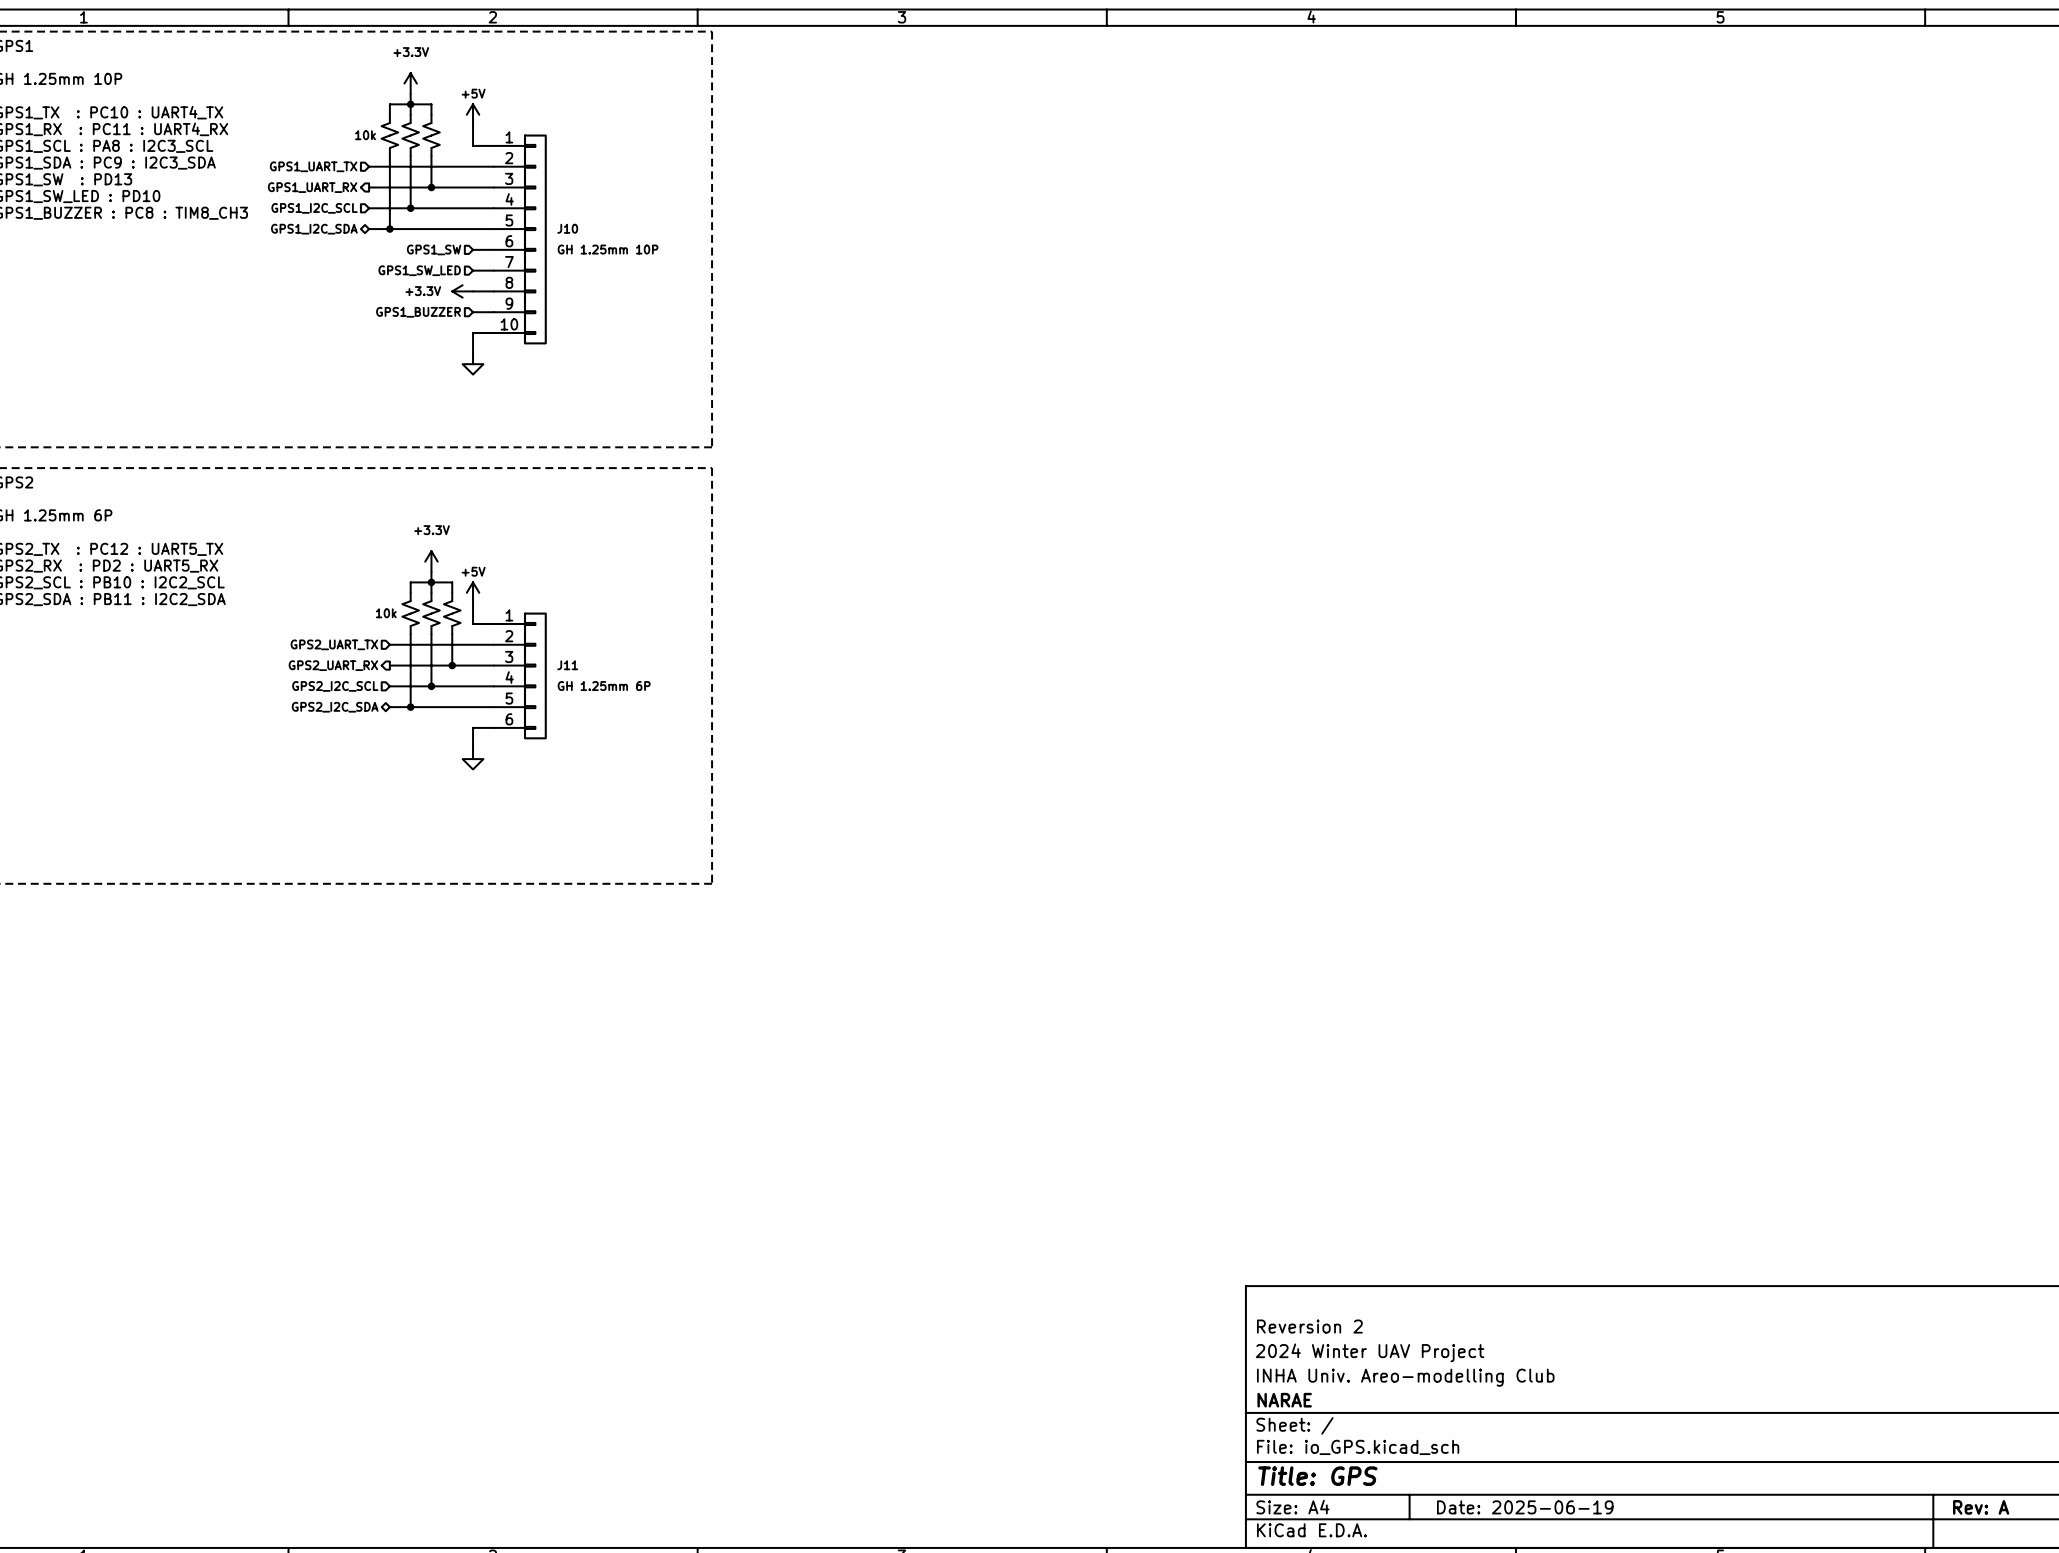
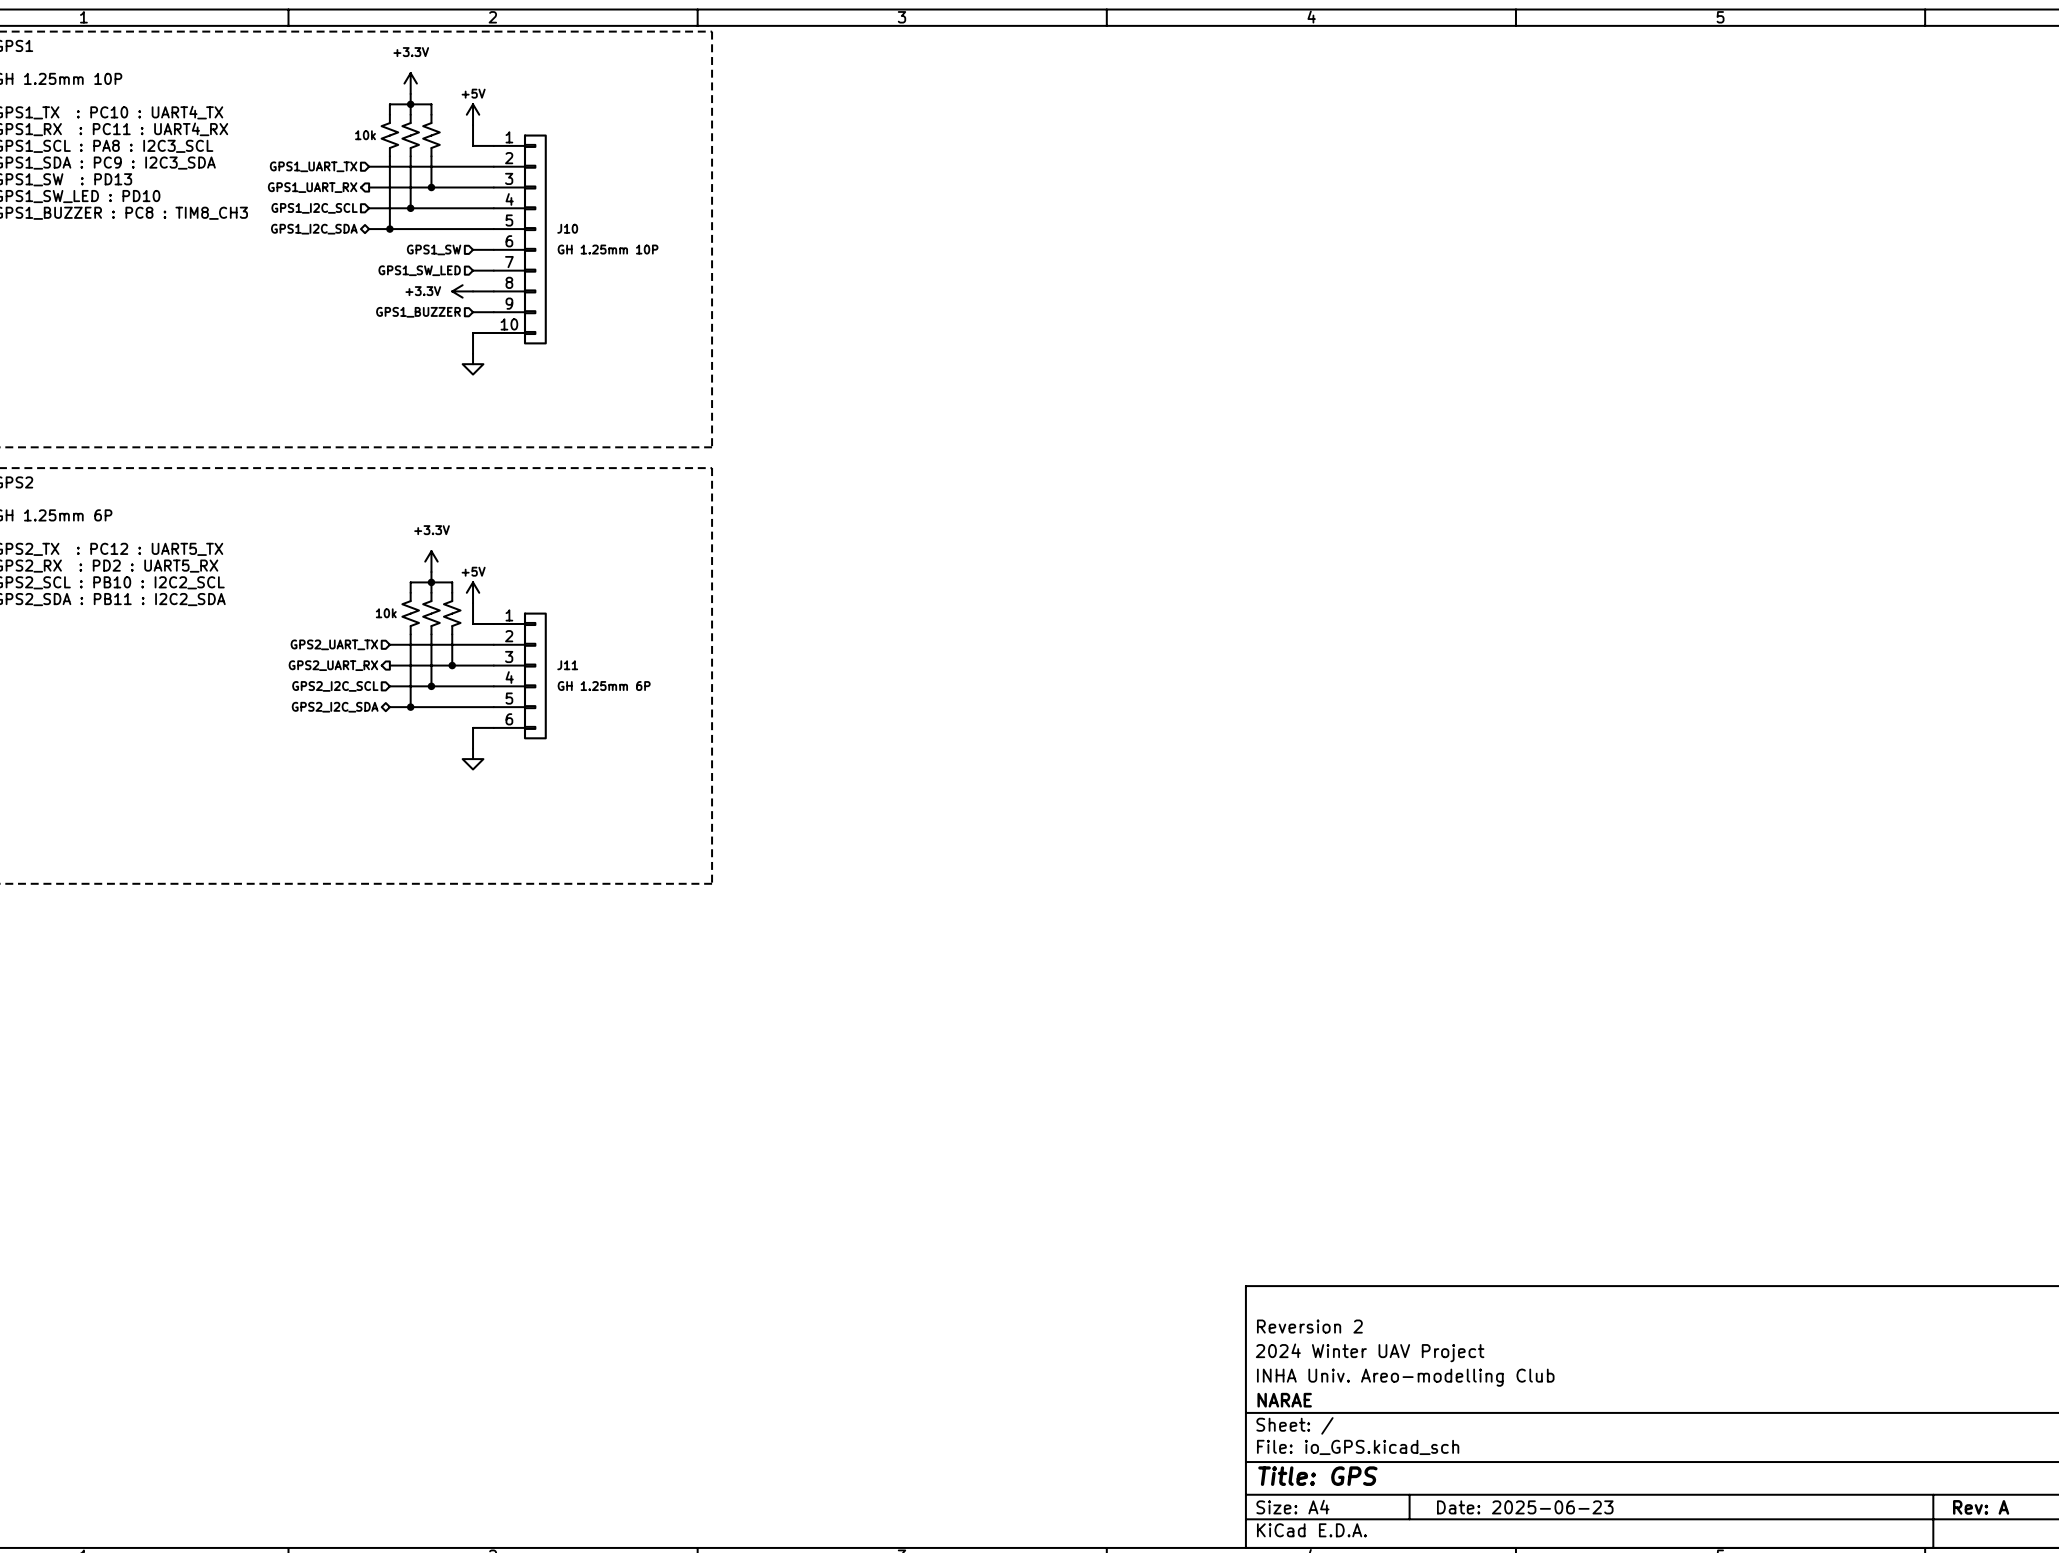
title block: Date: 2025-06-19 (1525, 1507) -> Date: 2025-06-23 (1525, 1507)

